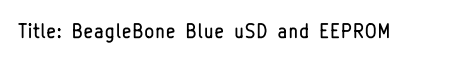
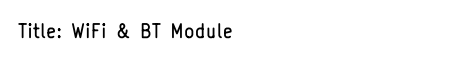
text: Title: BeagleBone Blue uSD and EEPROM (203, 32) -> Title: WiFi & BT Module (124, 30)

